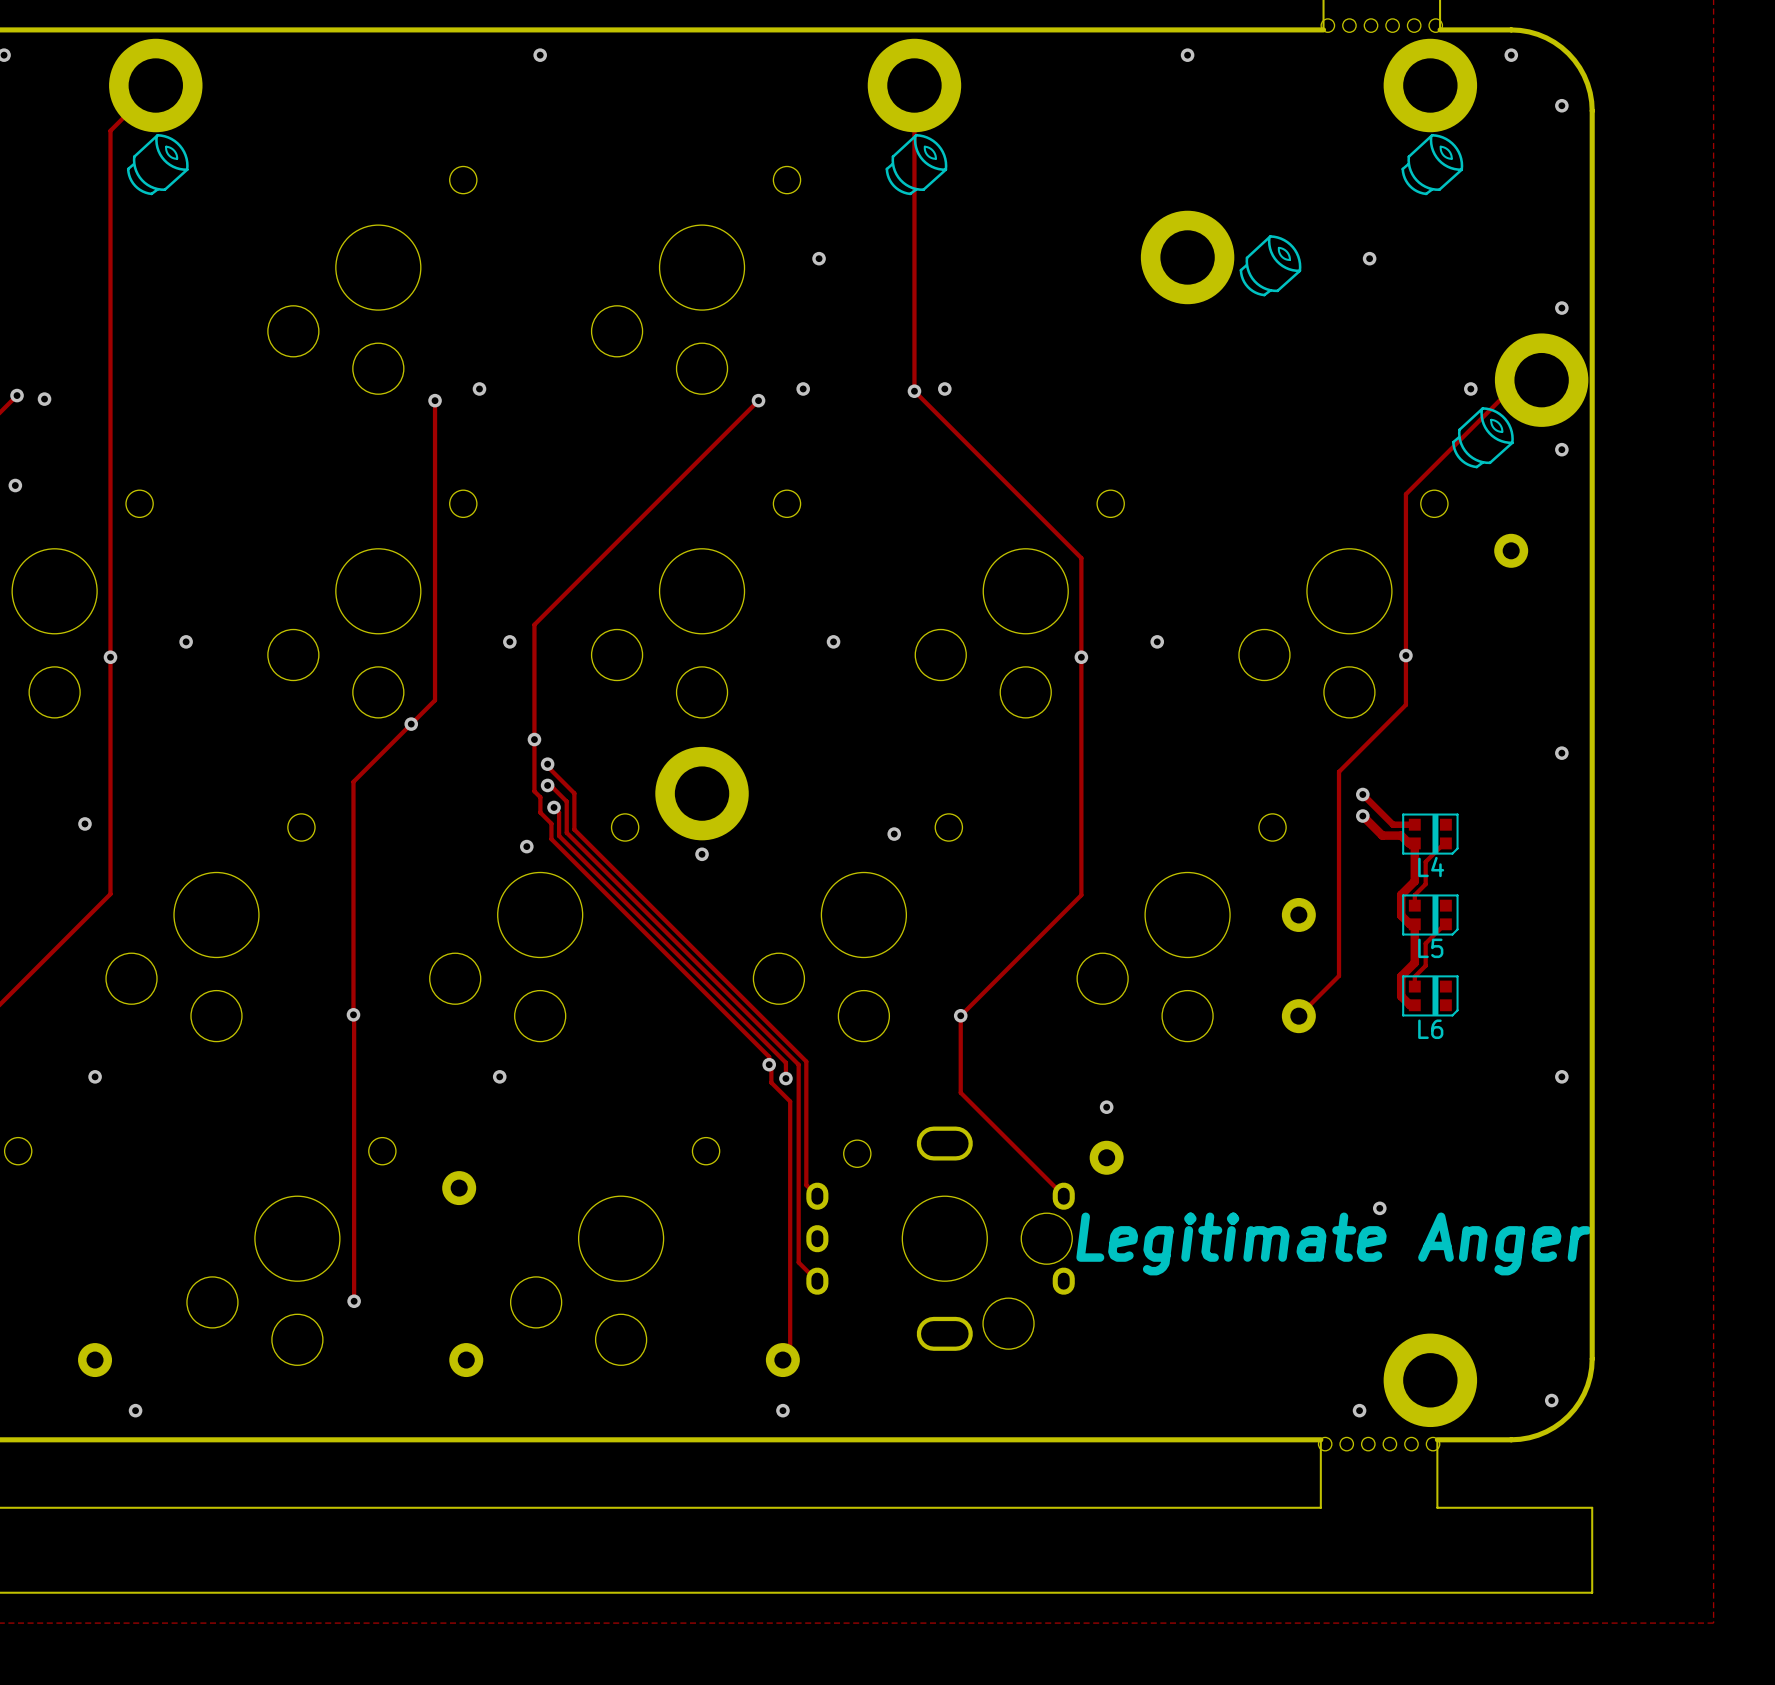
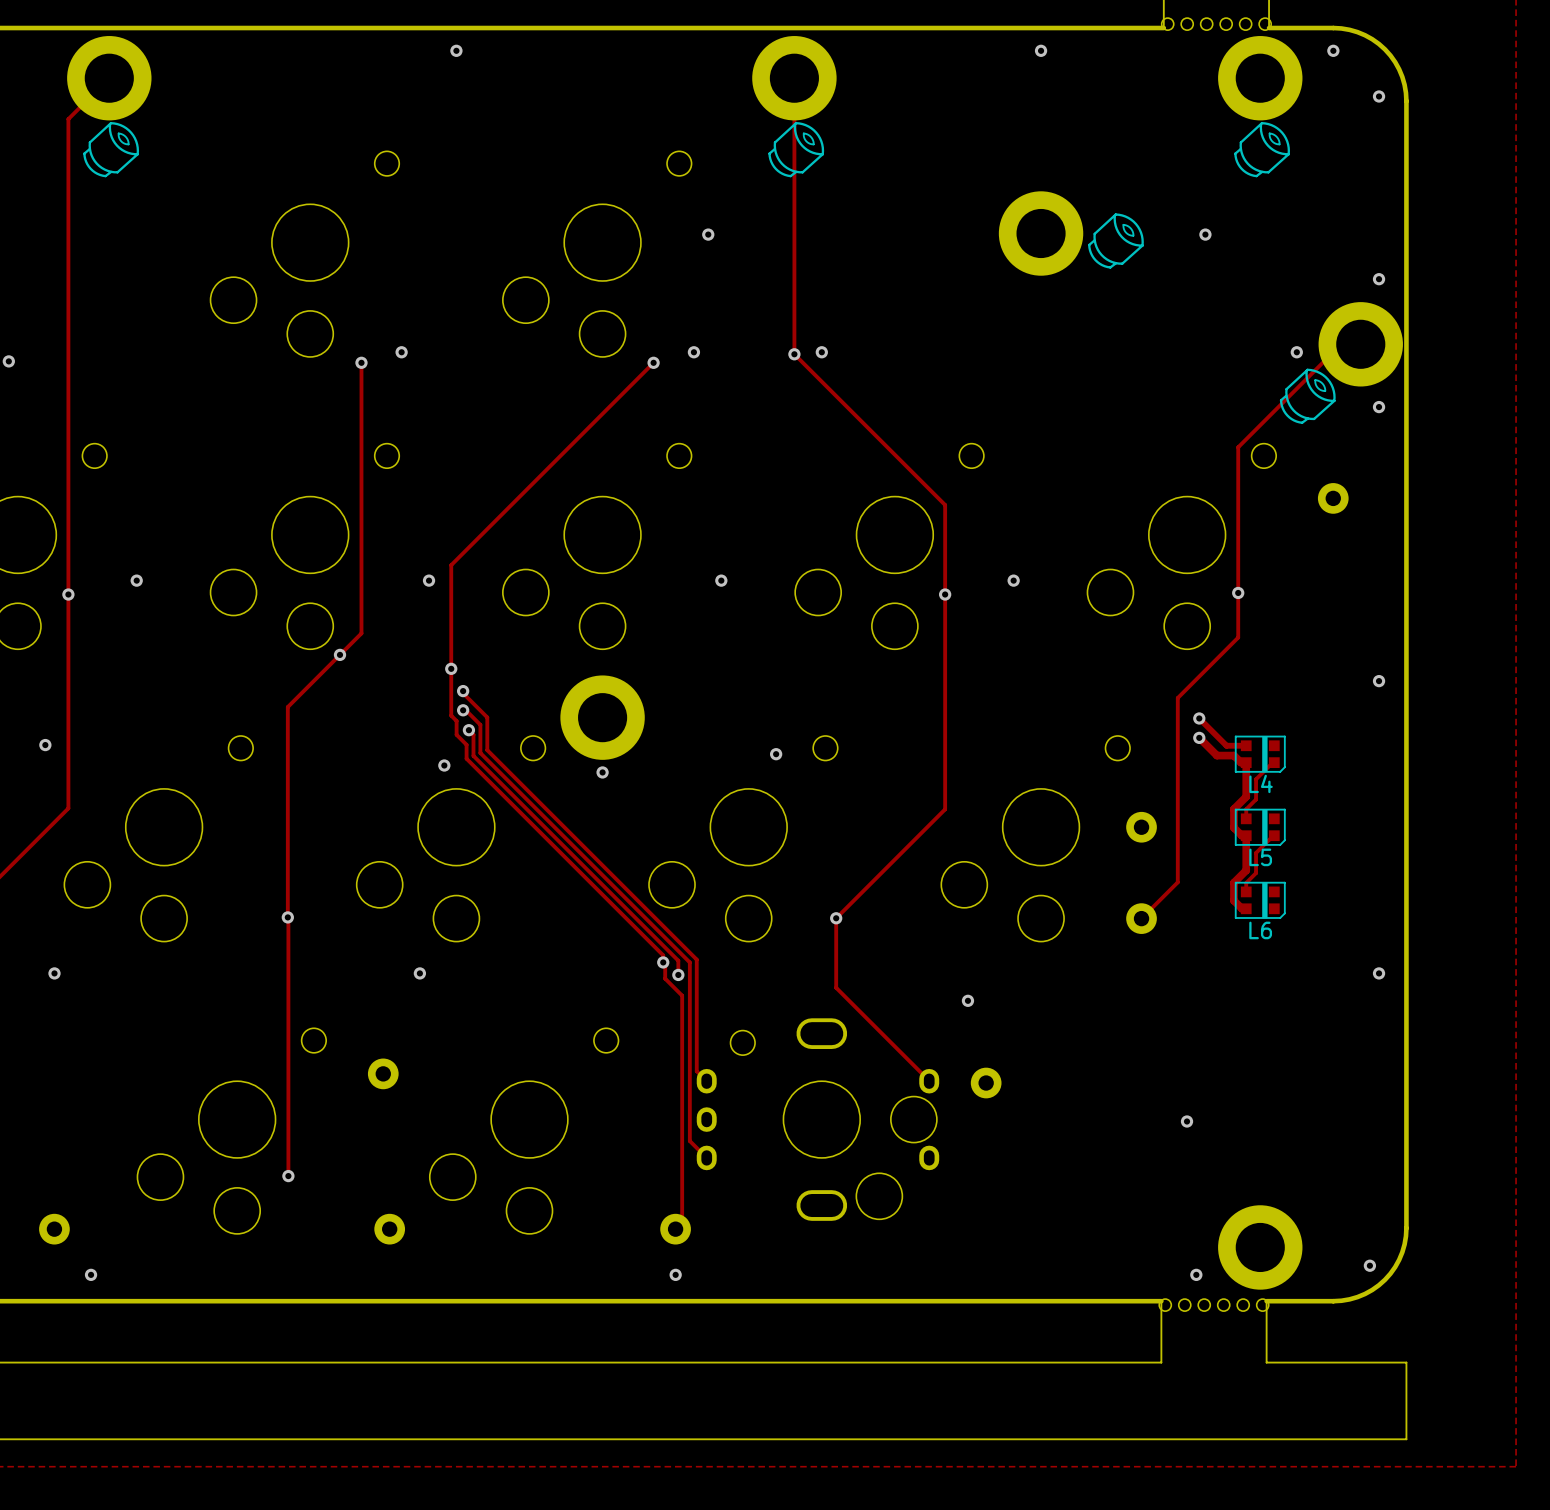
part position: (1106, 1157) -> (986, 1083)
via position: (1379, 1208) -> (1187, 1121)
text: Legitimate Anger (1333, 1243) -> none

